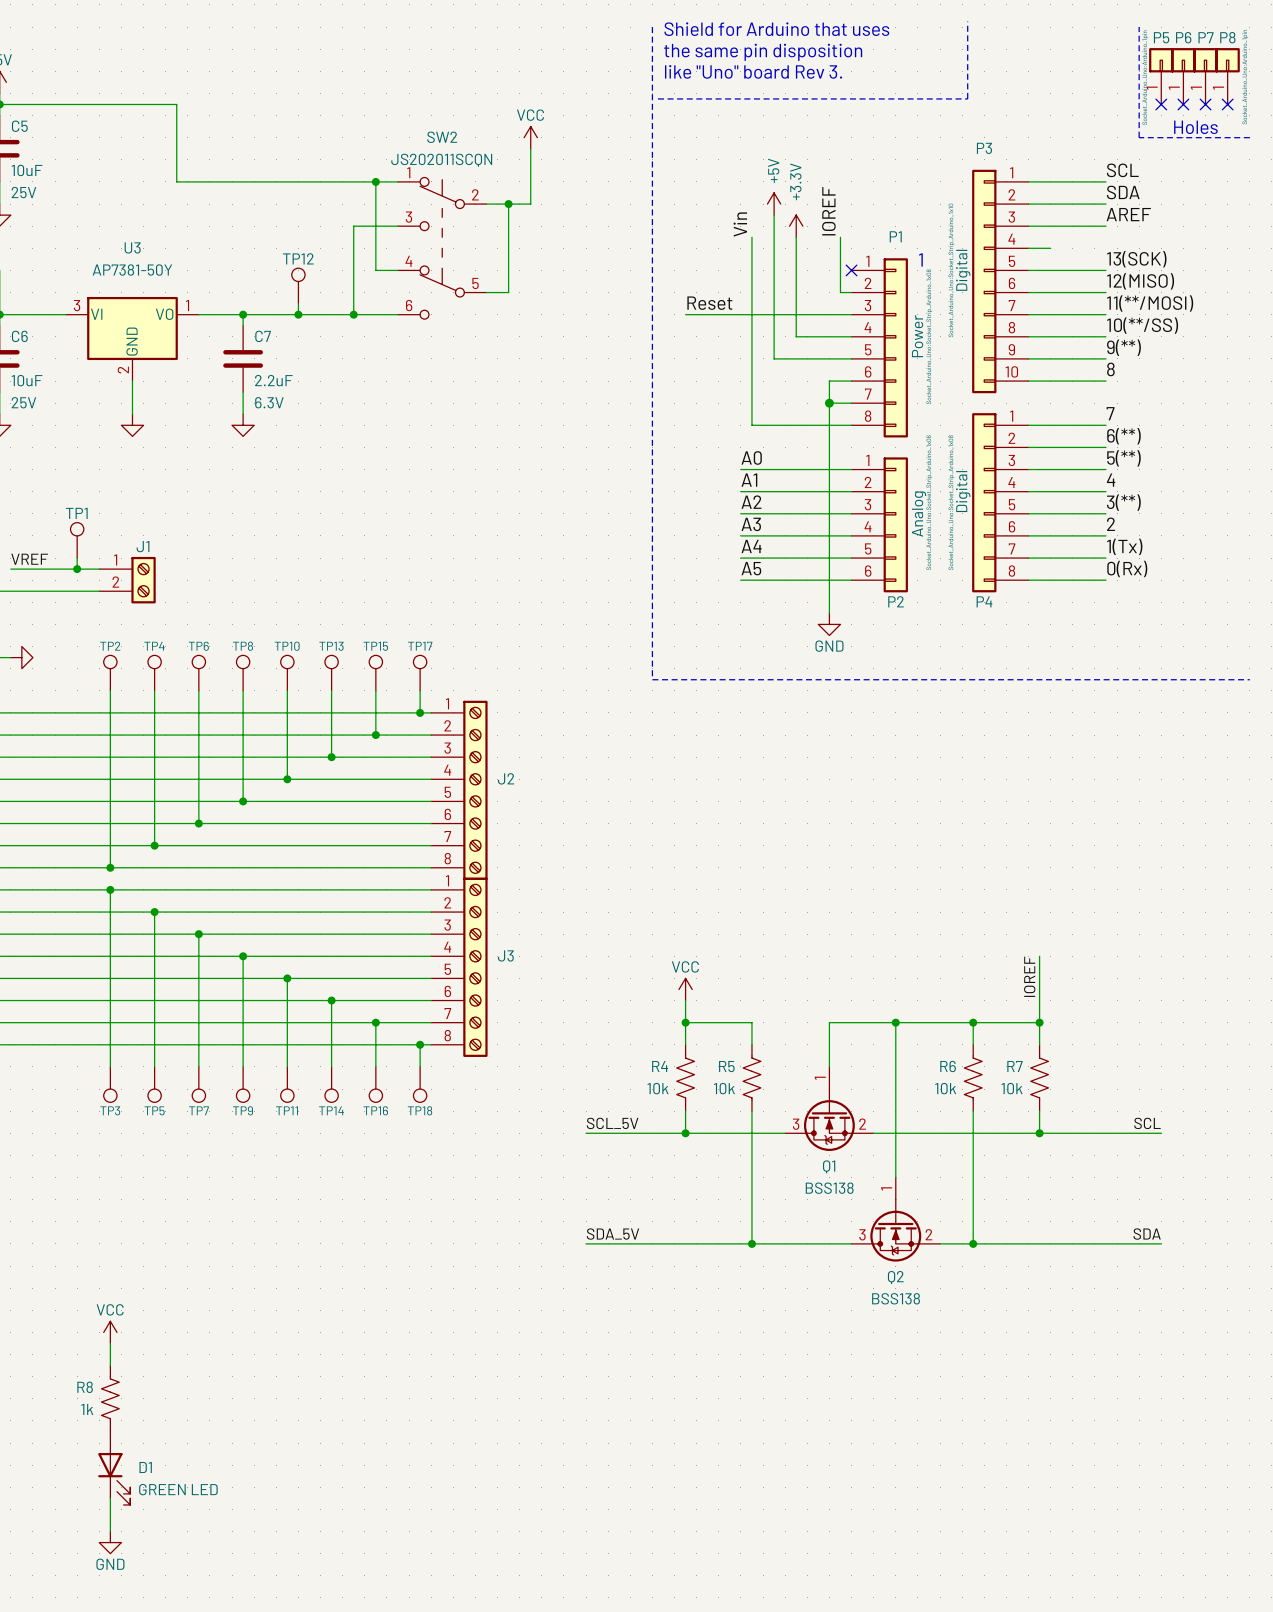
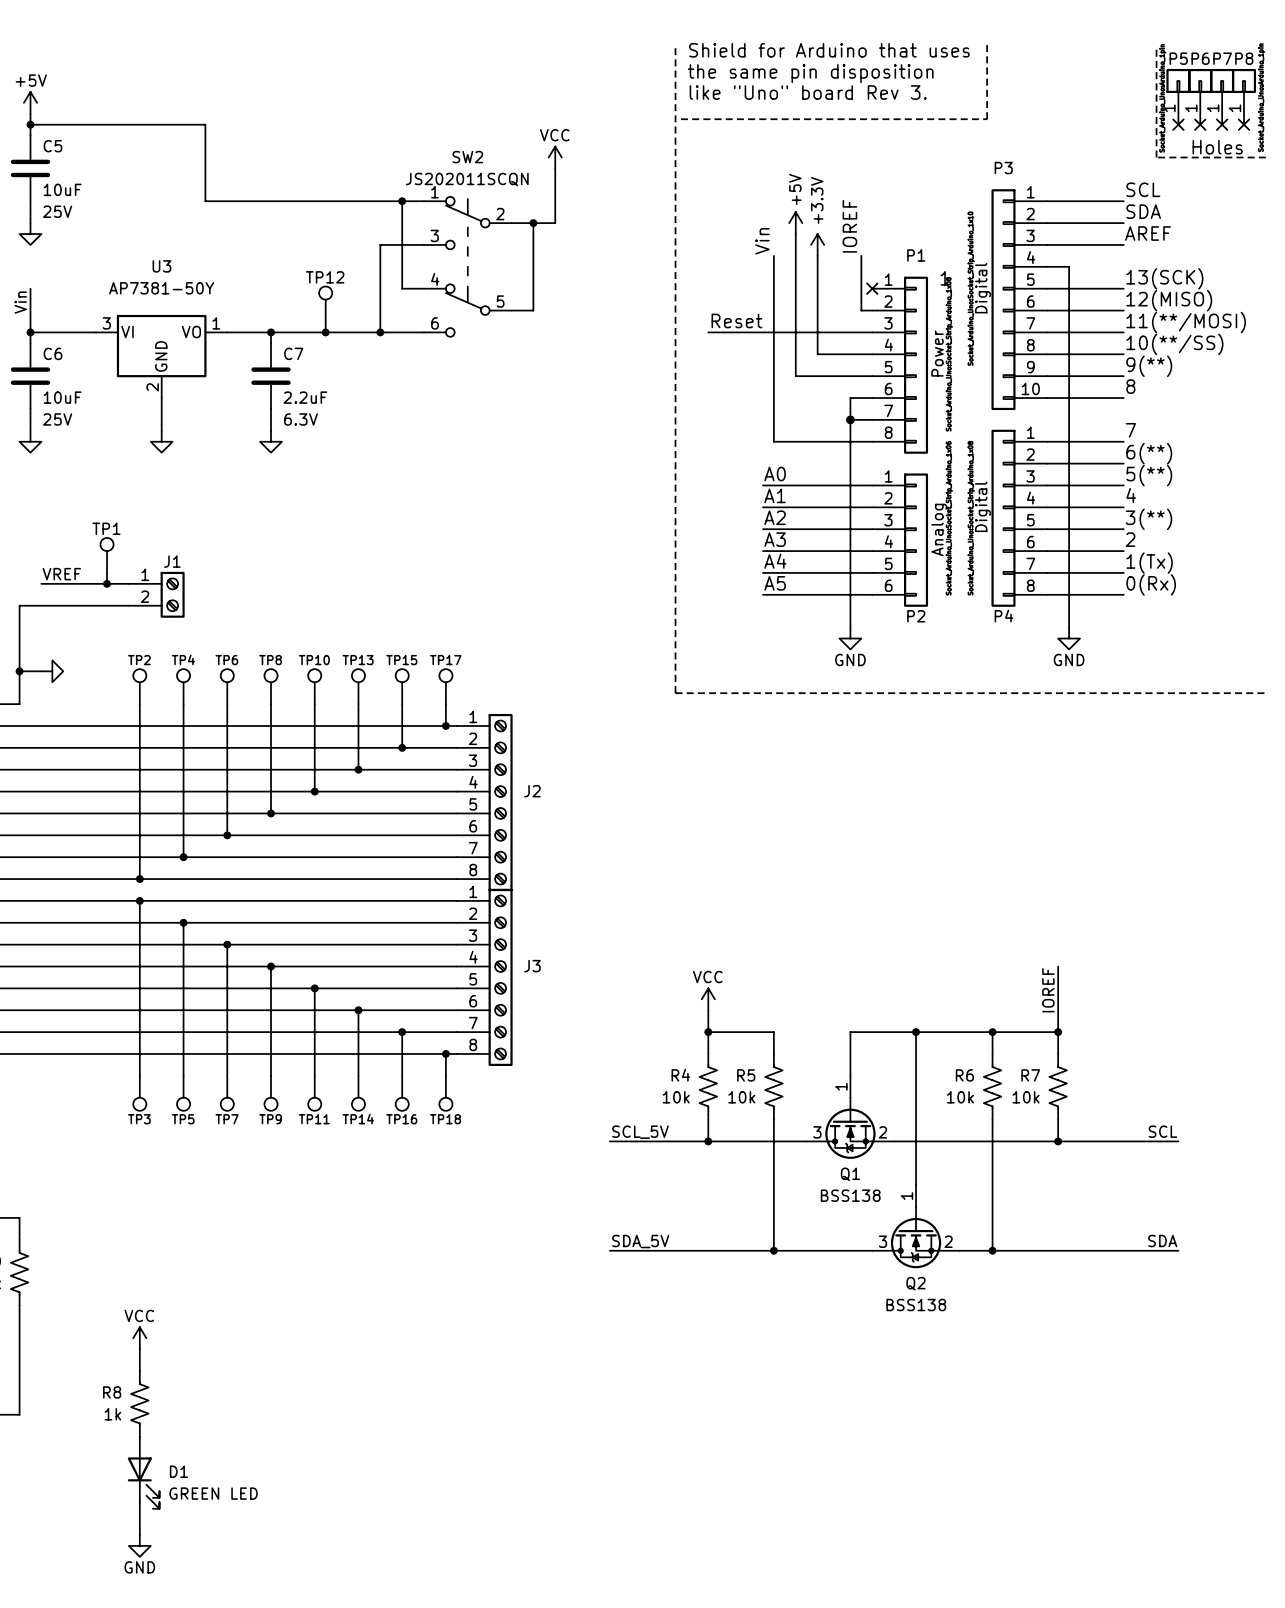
wire: none -> (1069, 266) (1069, 627)
power symbol: none -> GND (1069, 638)

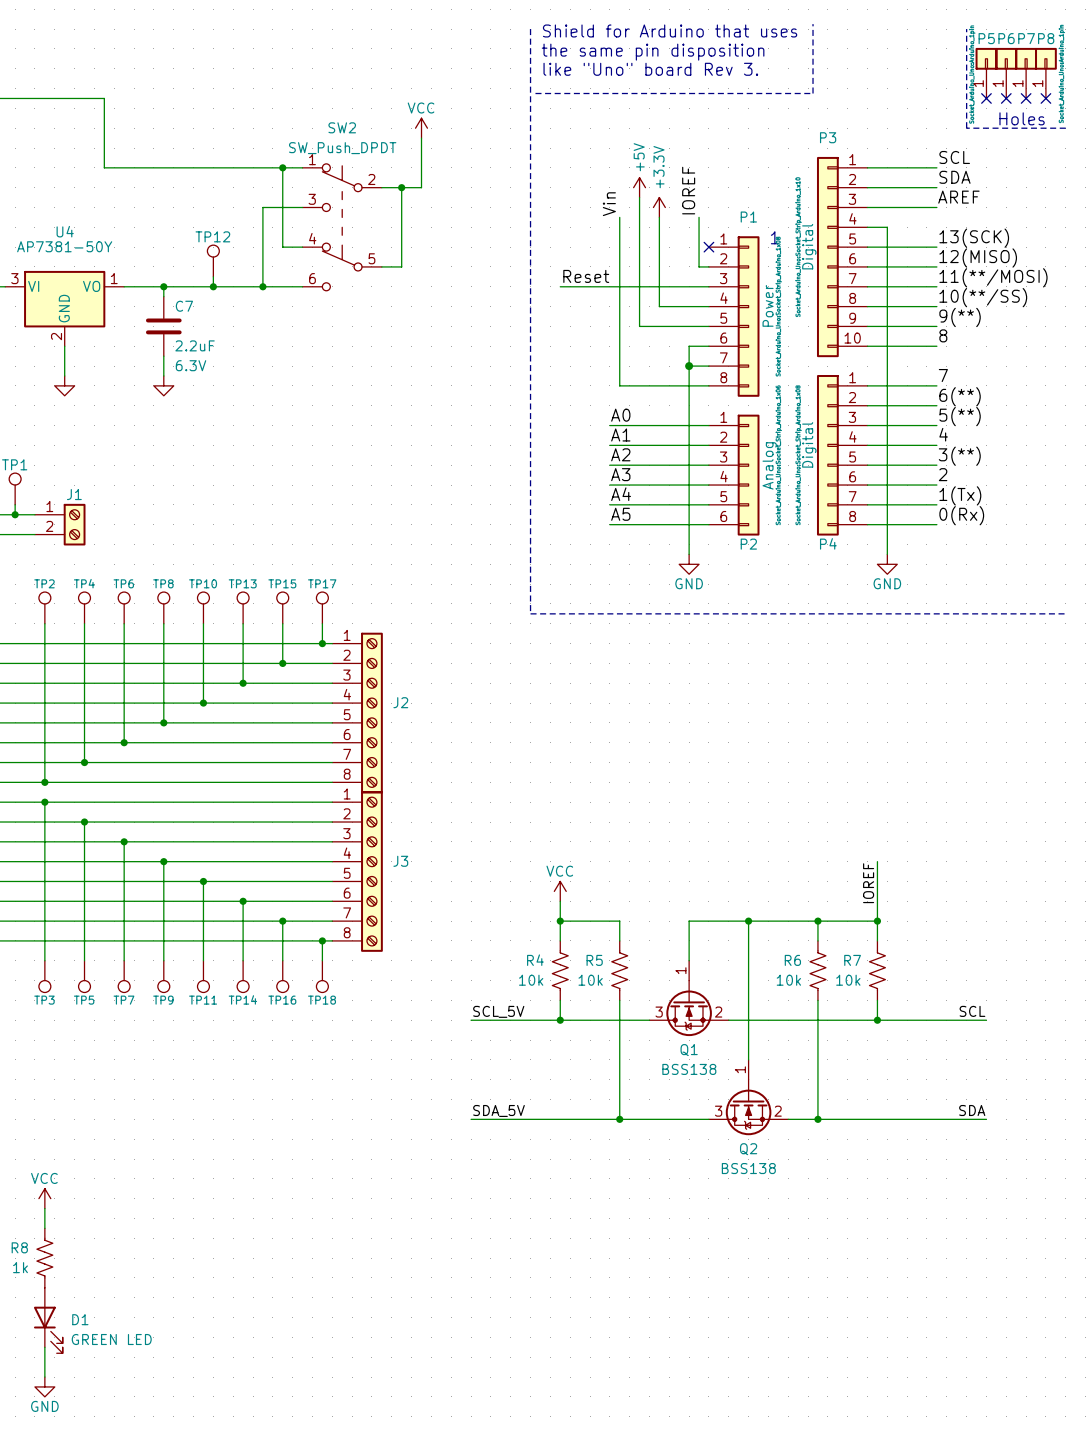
SW2 value: JS202011SCQN (467, 179) -> SW_Push_DPDT (342, 148)
U3 name: U3 (161, 266) -> U4 (65, 231)

